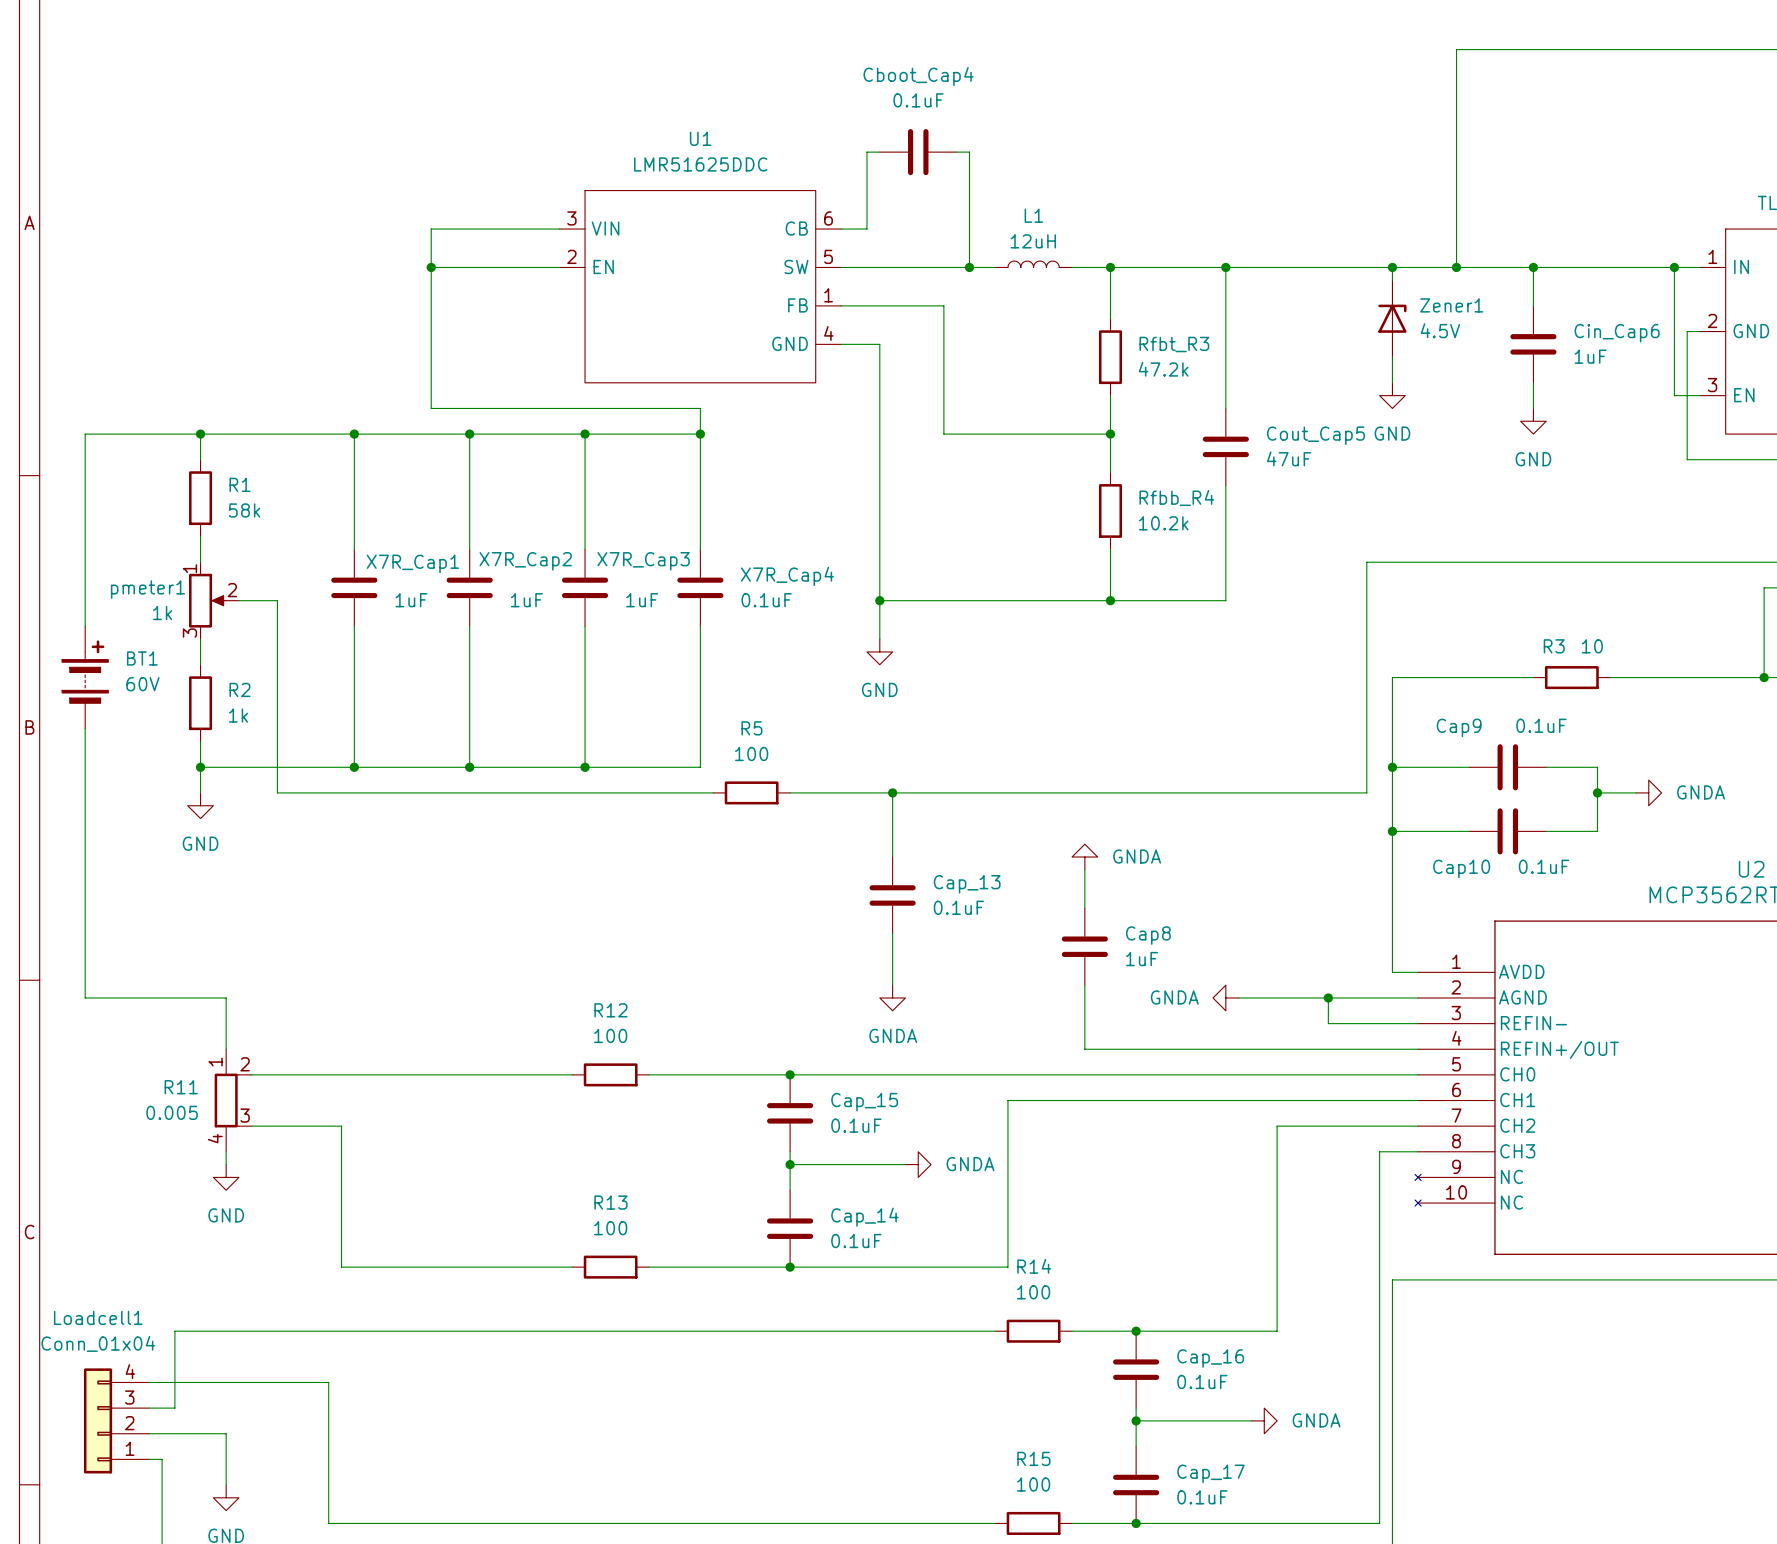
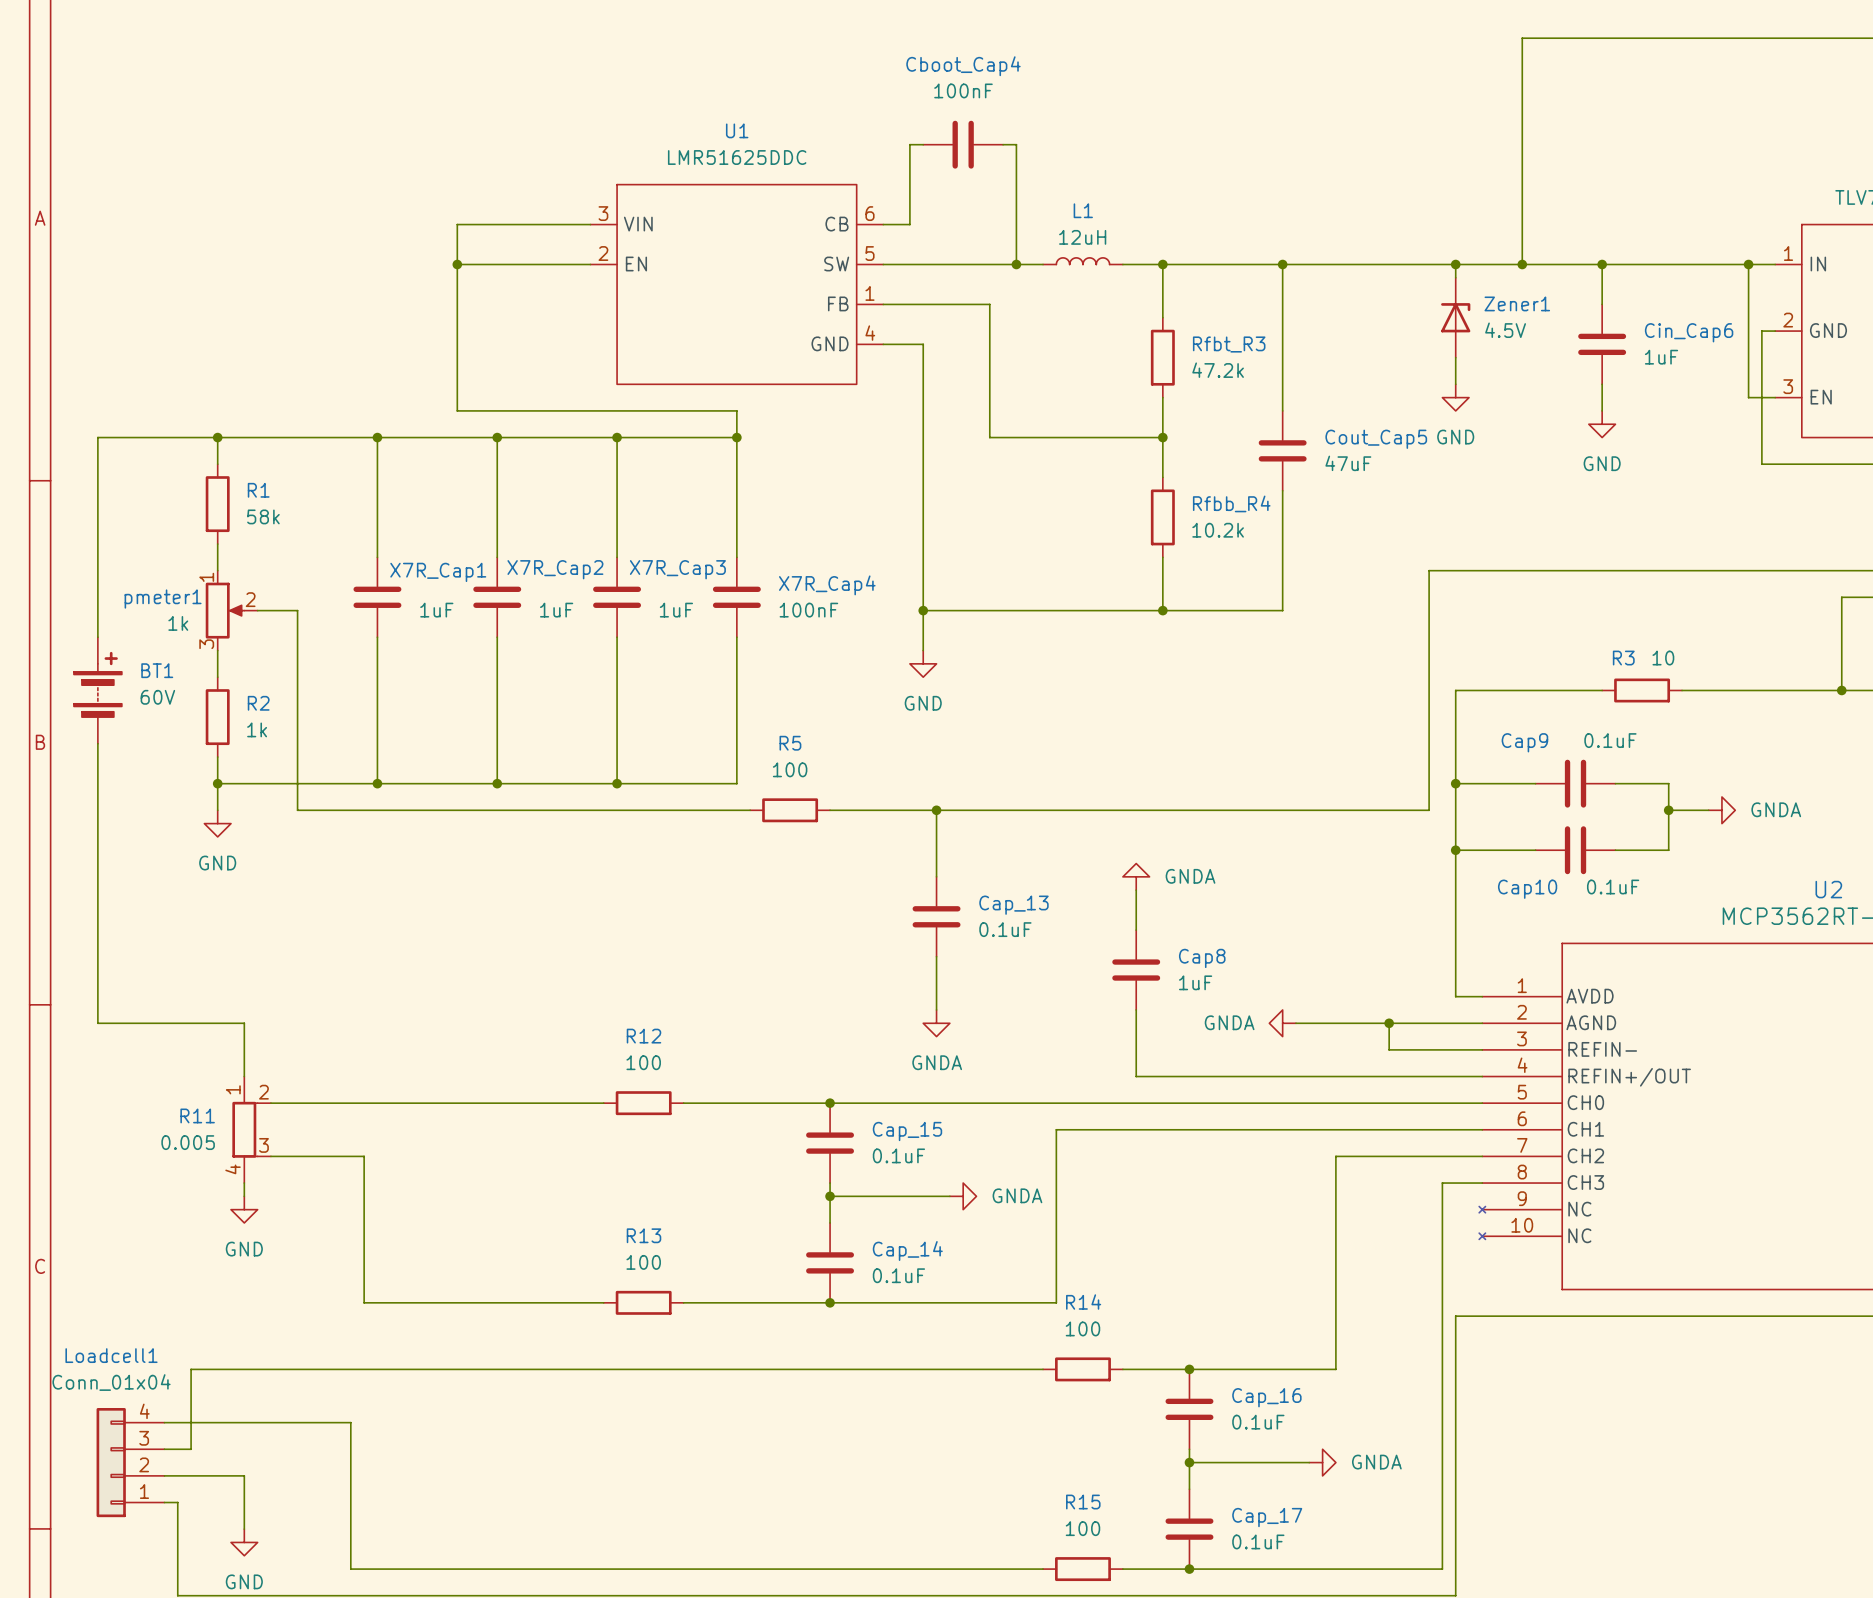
Cboot_Cap4 value: 0.1uF (918, 100) -> 100nF (963, 90)
X7R_Cap4 value: 0.1uF (766, 600) -> 100nF (808, 610)

